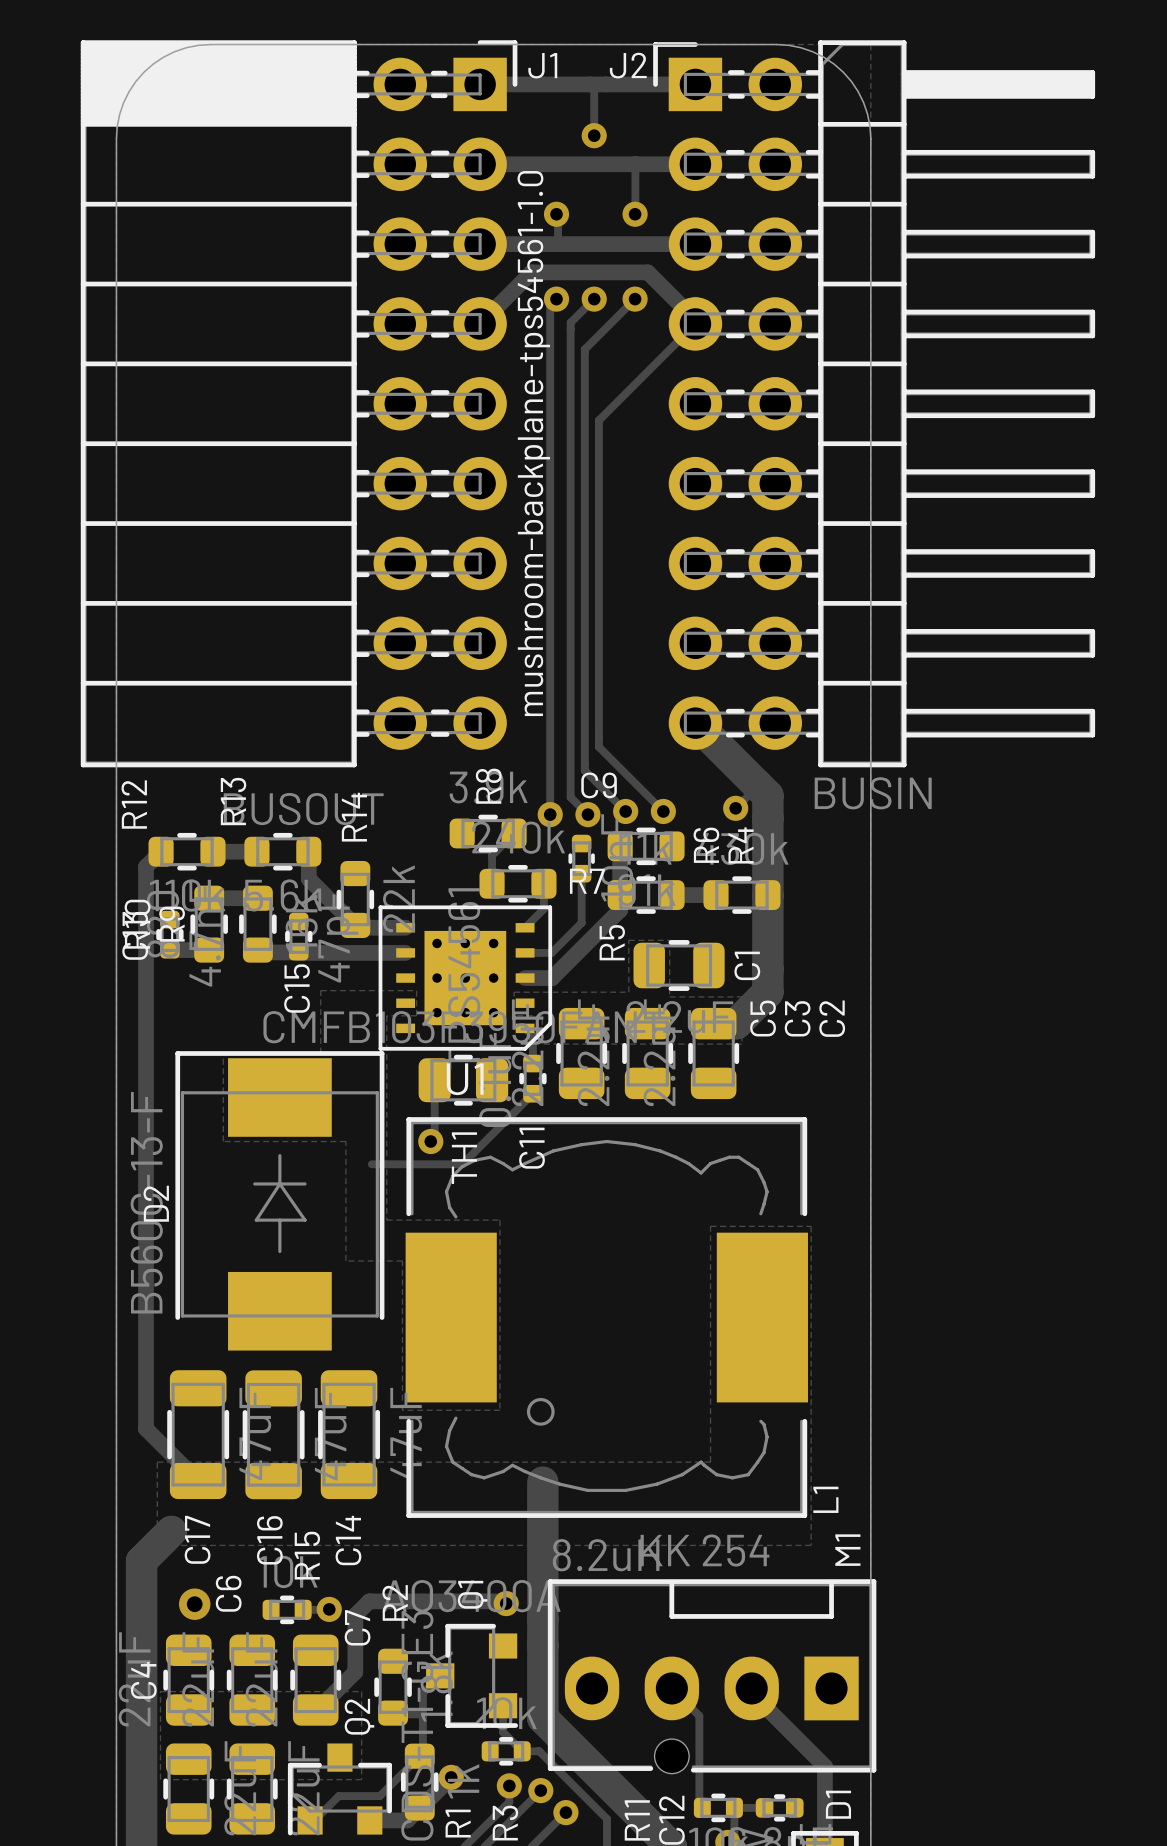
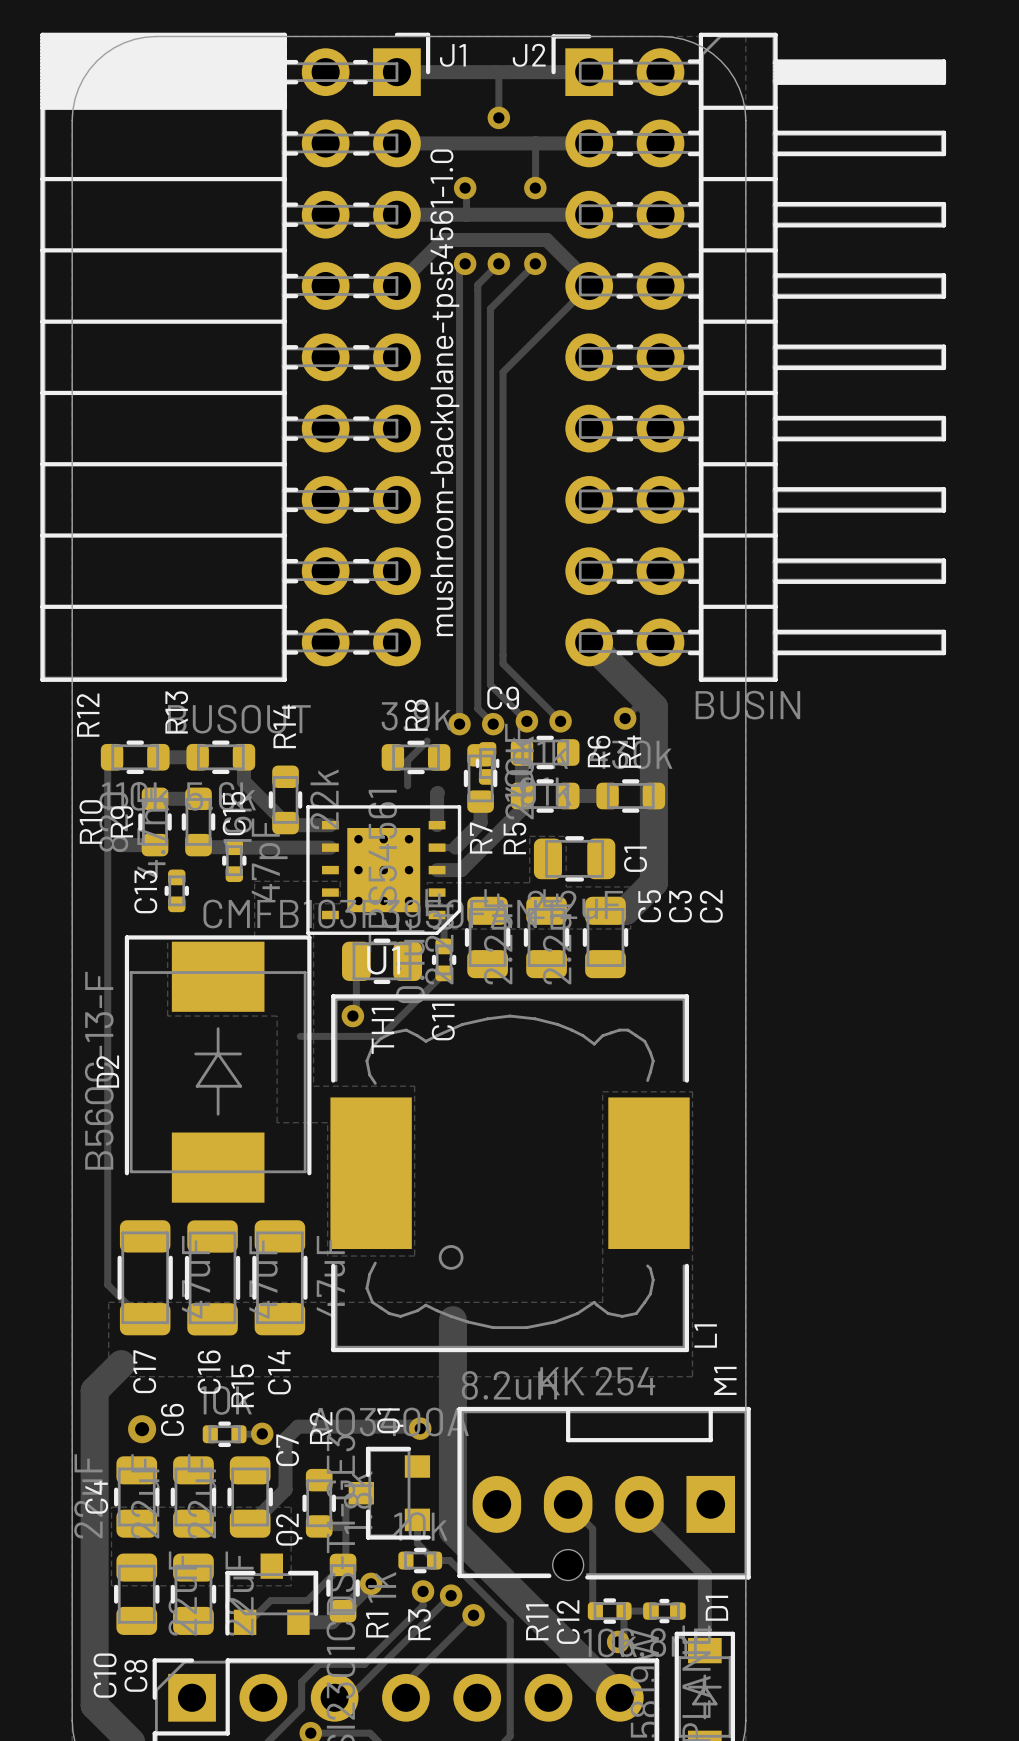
R8 position: (488, 833) -> (416, 757)
track: (161, 851) (146, 866) (146, 1428) (198, 1480) -> none
track: none -> (107, 761) (107, 1284) (142, 1319)
track: (581, 873) (581, 922) (551, 952) (545, 952) -> (480, 801) (480, 822) (455, 847)
R7 rotation: 0° (518, 883) -> 90° clockwise (480, 778)
R7 position: (518, 883) -> (480, 778)
track: (543, 883) (543, 908) (525, 927) -> (437, 792) (437, 825)
C13 position: (169, 934) -> (176, 890)
C15 position: (298, 936) -> (234, 860)
C15 name position: C15 (297, 988) -> C15 (234, 813)

